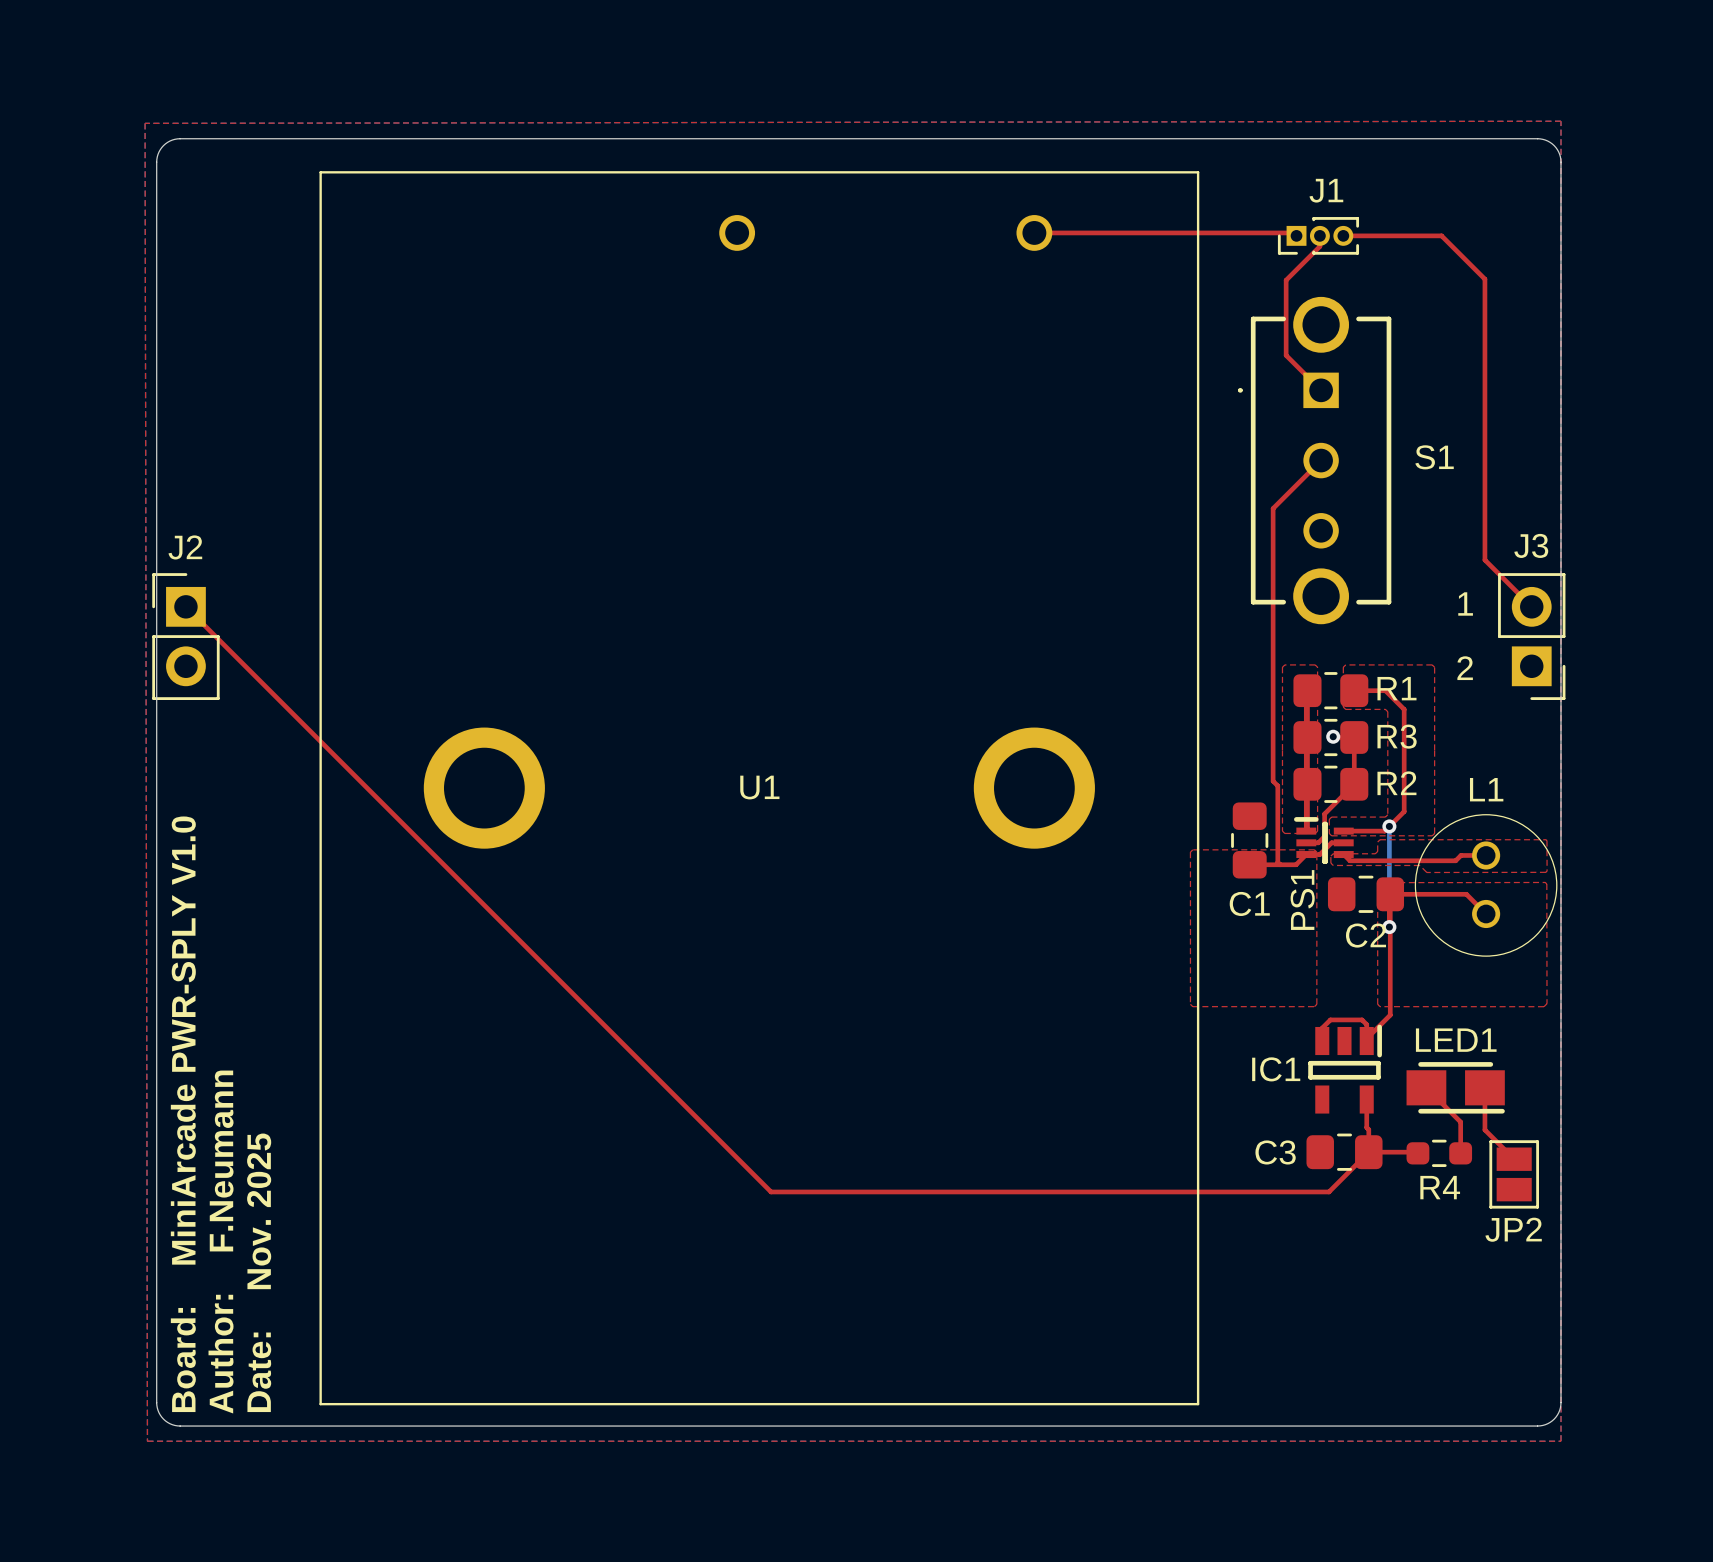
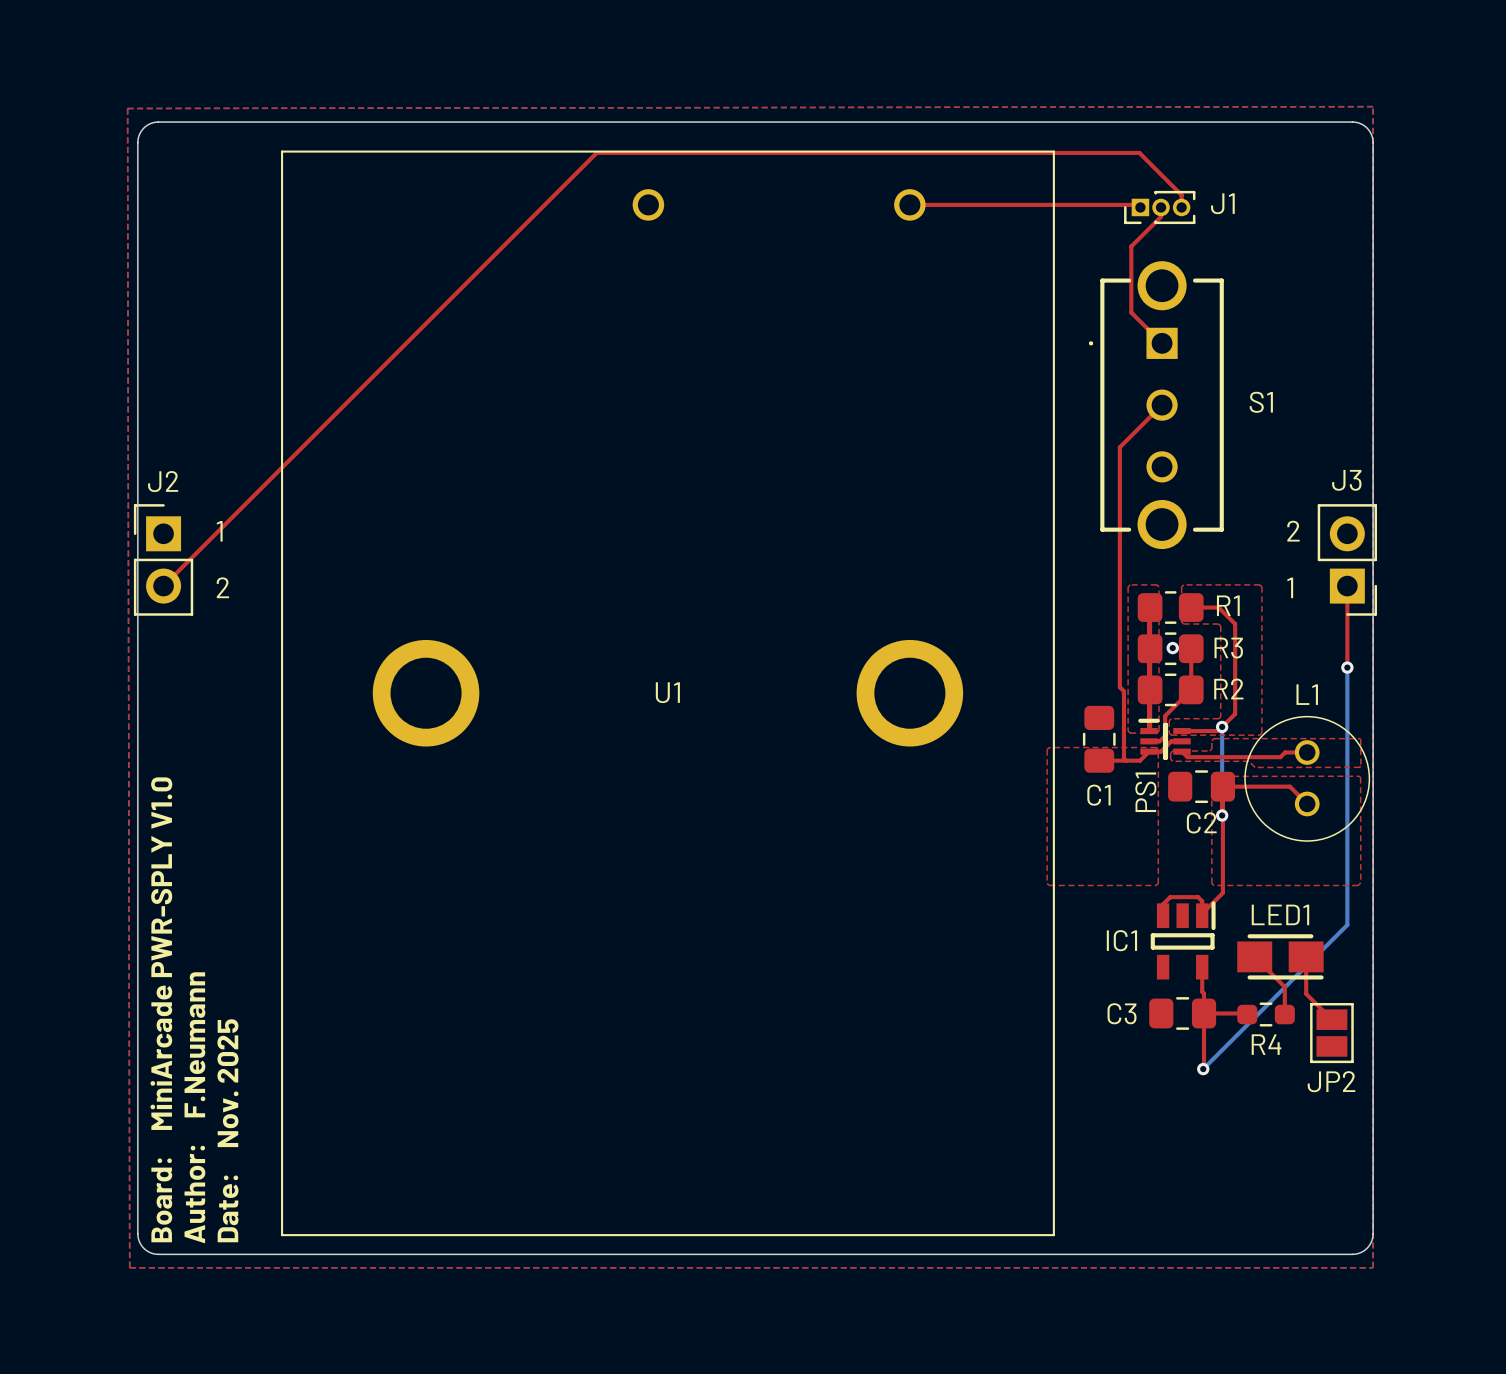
J1 name position: J1 (1326, 190) -> J1 (1222, 203)
top track: (1343, 235) (1441, 235) (1484, 279) (1484, 560) (1531, 606) -> (1181, 207) (1181, 195) (1139, 152) (596, 152) (163, 586)
text: none -> 1 (219, 531)
text: 1 (1465, 603) -> 2 (1293, 531)
top track: (185, 606) (771, 1191) (1329, 1191) (1368, 1152) -> (1203, 1069) (1204, 1013)
top track: none -> (1347, 586) (1347, 667)
text: none -> 2 (222, 587)
text: 2 (1465, 668) -> 1 (1290, 587)
bottom track: none -> (1347, 667) (1347, 924) (1203, 1069)
via: none -> (1347, 667)
via: none -> (1203, 1069)

